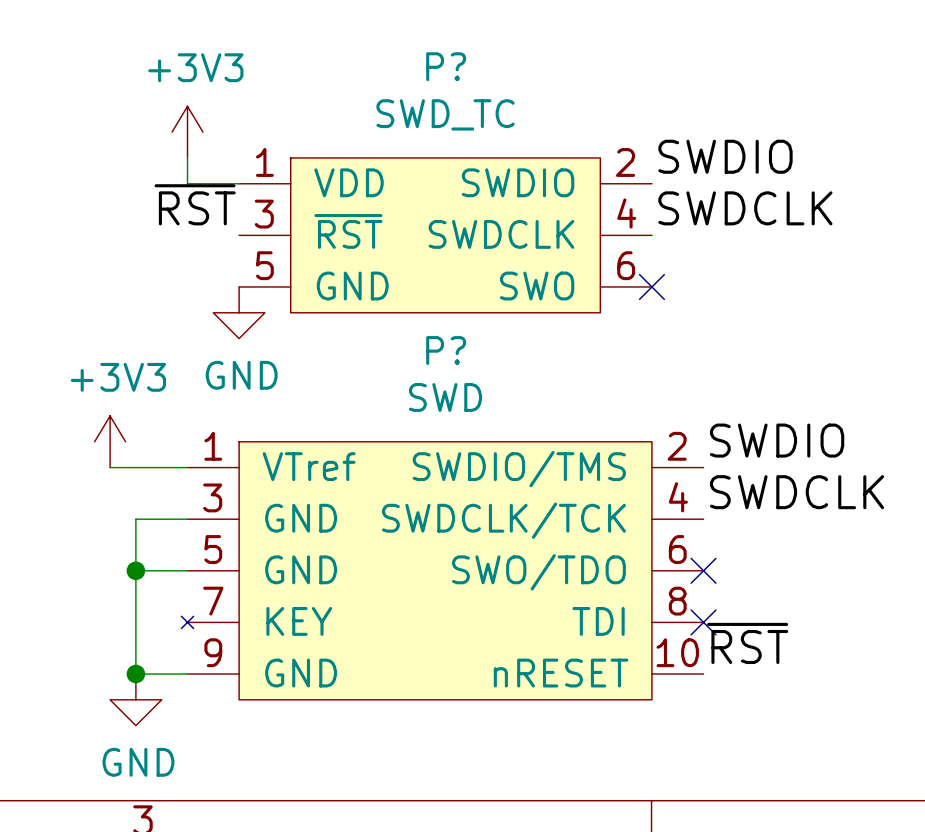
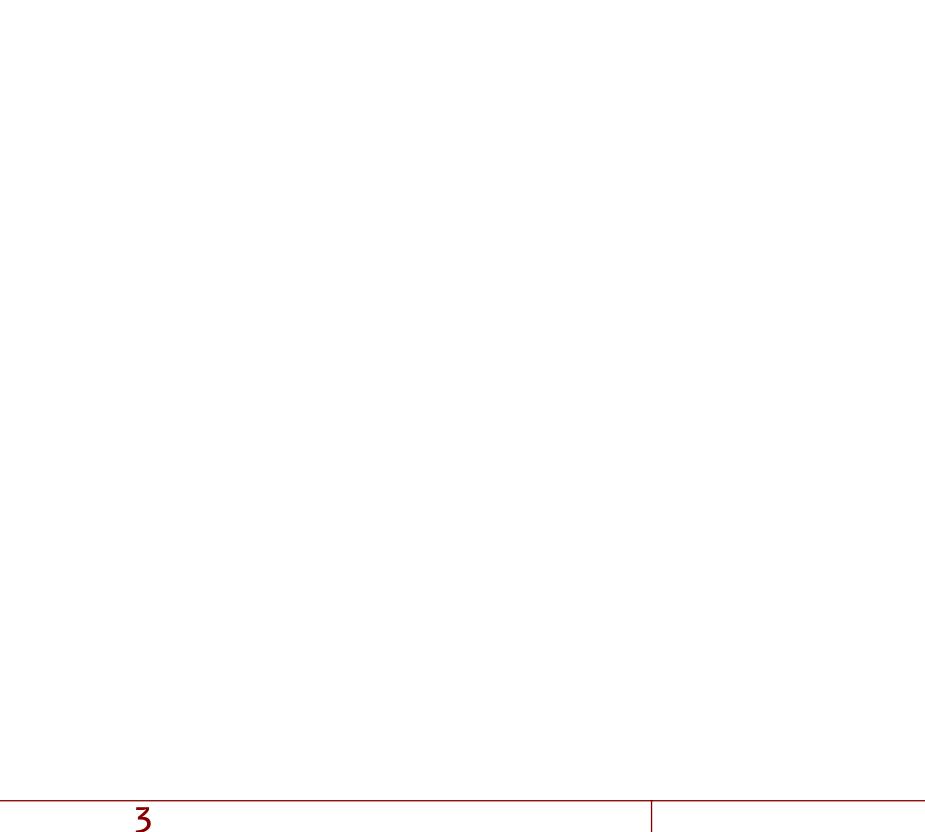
power symbol: +3V3 (187, 132) -> none
label: SWDIO (725, 156) -> none
wire: (187, 157) (187, 183) (239, 183) -> none
label: ~{RST} (195, 204) -> none
label: SWDCLK (745, 208) -> none
P?: SWD_TC (445, 235) -> none
no-connect mark: (651, 286) -> none
power symbol: GND (239, 312) -> none
label: SWDIO (777, 440) -> none
power symbol: +3V3 (110, 441) -> none
wire: (110, 467) (187, 467) -> none
label: SWDCLK (797, 492) -> none
wire: (187, 519) (135, 519) (135, 674) (187, 674) -> none
wire: (135, 570) (187, 570) -> none
junction: (135, 570) -> none
P?: SWD (442, 570) -> none
no-connect mark: (703, 570) -> none
no-connect mark: (703, 622) -> none
label: ~{RST} (747, 643) -> none
junction: (135, 674) -> none
power symbol: GND (135, 699) -> none

